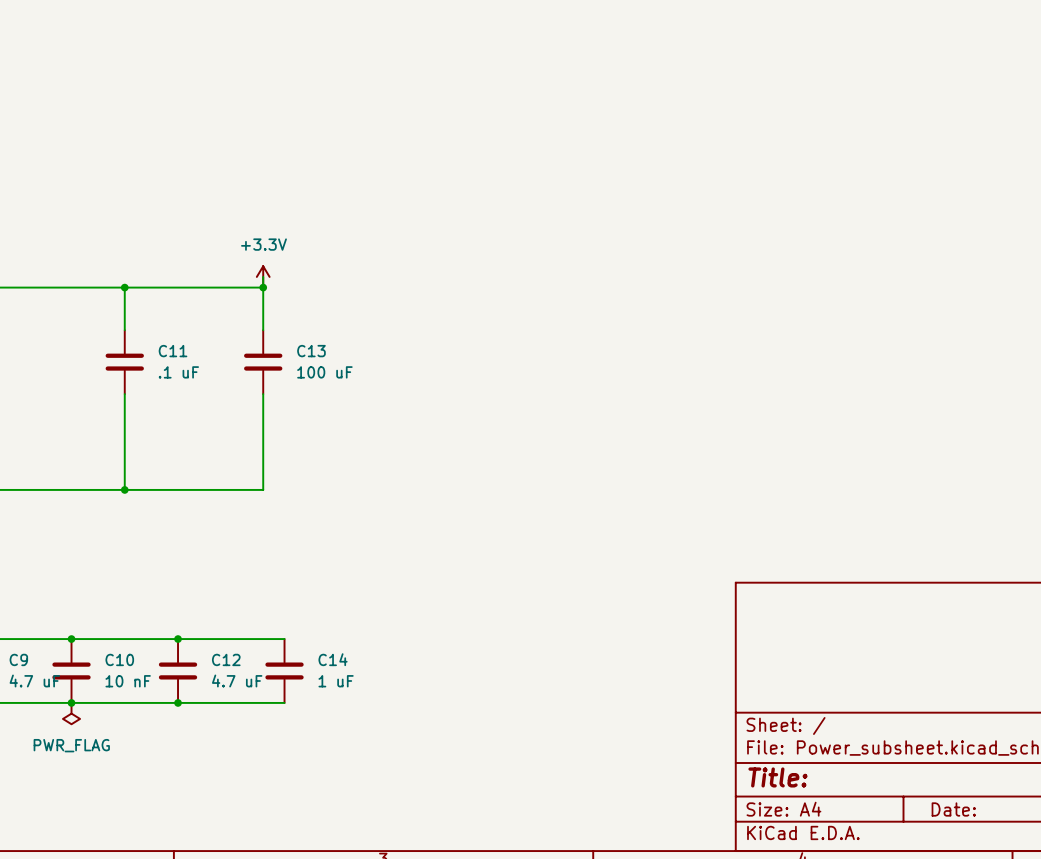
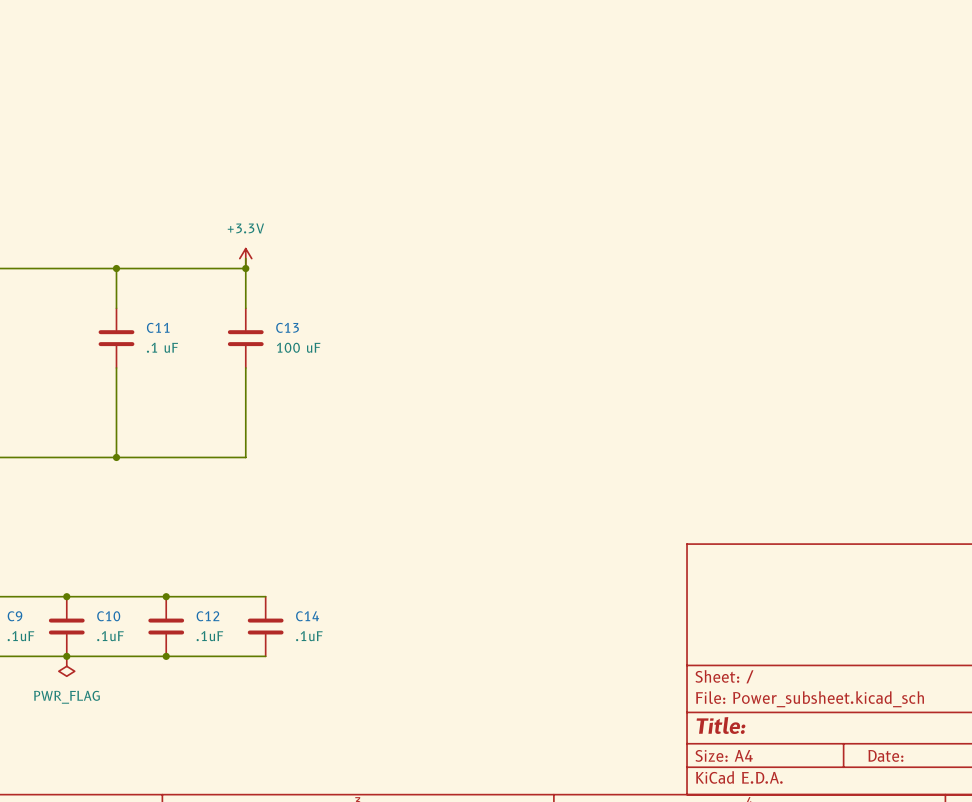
C9 value: 4.7 uF (34, 681) -> .1uF (20, 636)
C10 value: 10 nF (128, 681) -> .1uF (110, 636)
C12 value: 4.7 uF (237, 681) -> .1uF (209, 636)
C14 value: 1 uF (336, 681) -> .1uF (309, 636)

